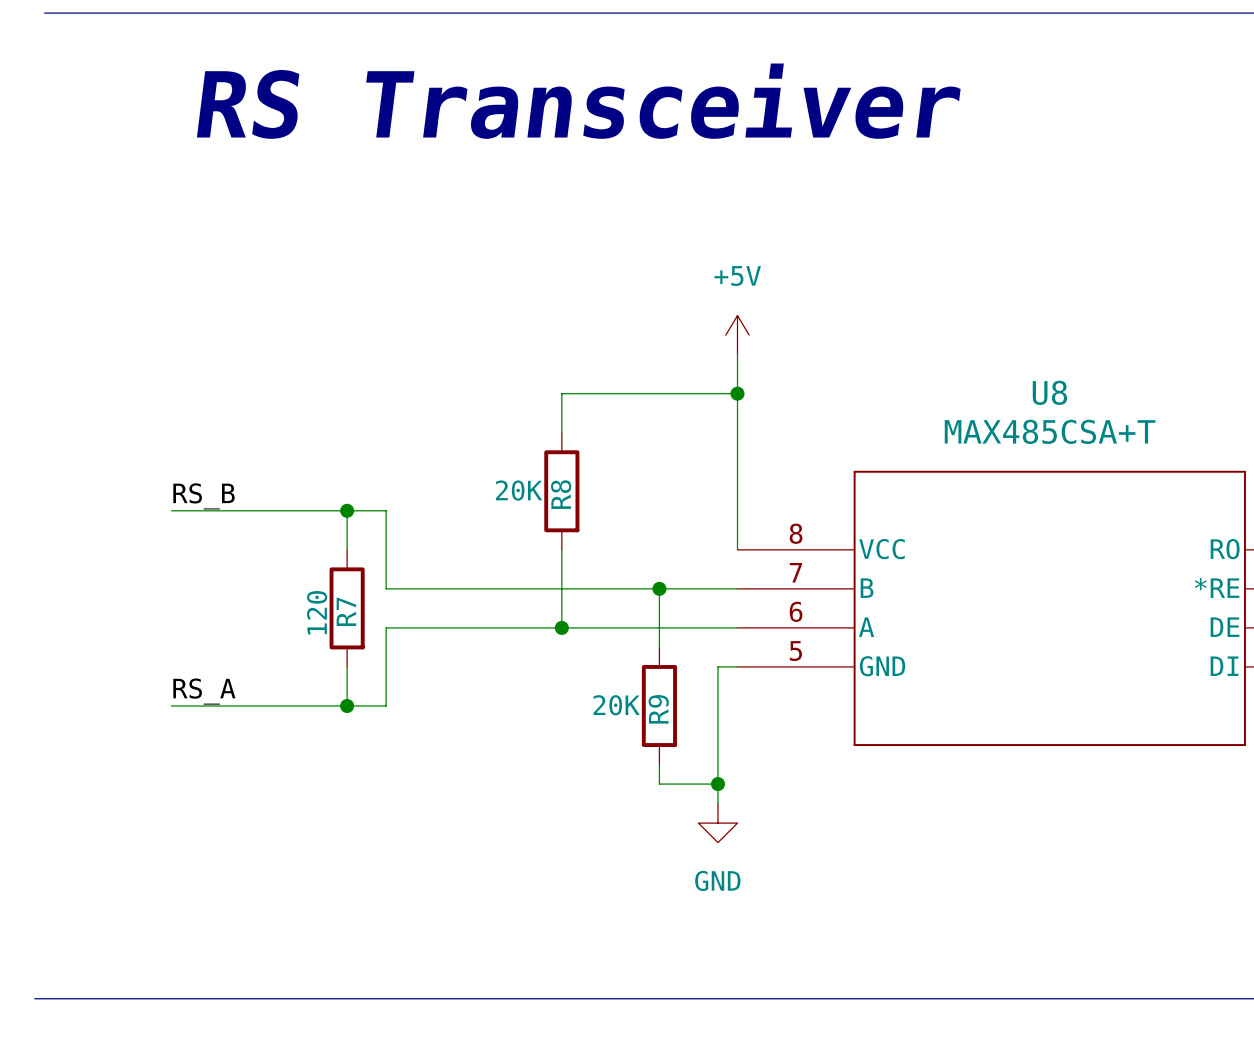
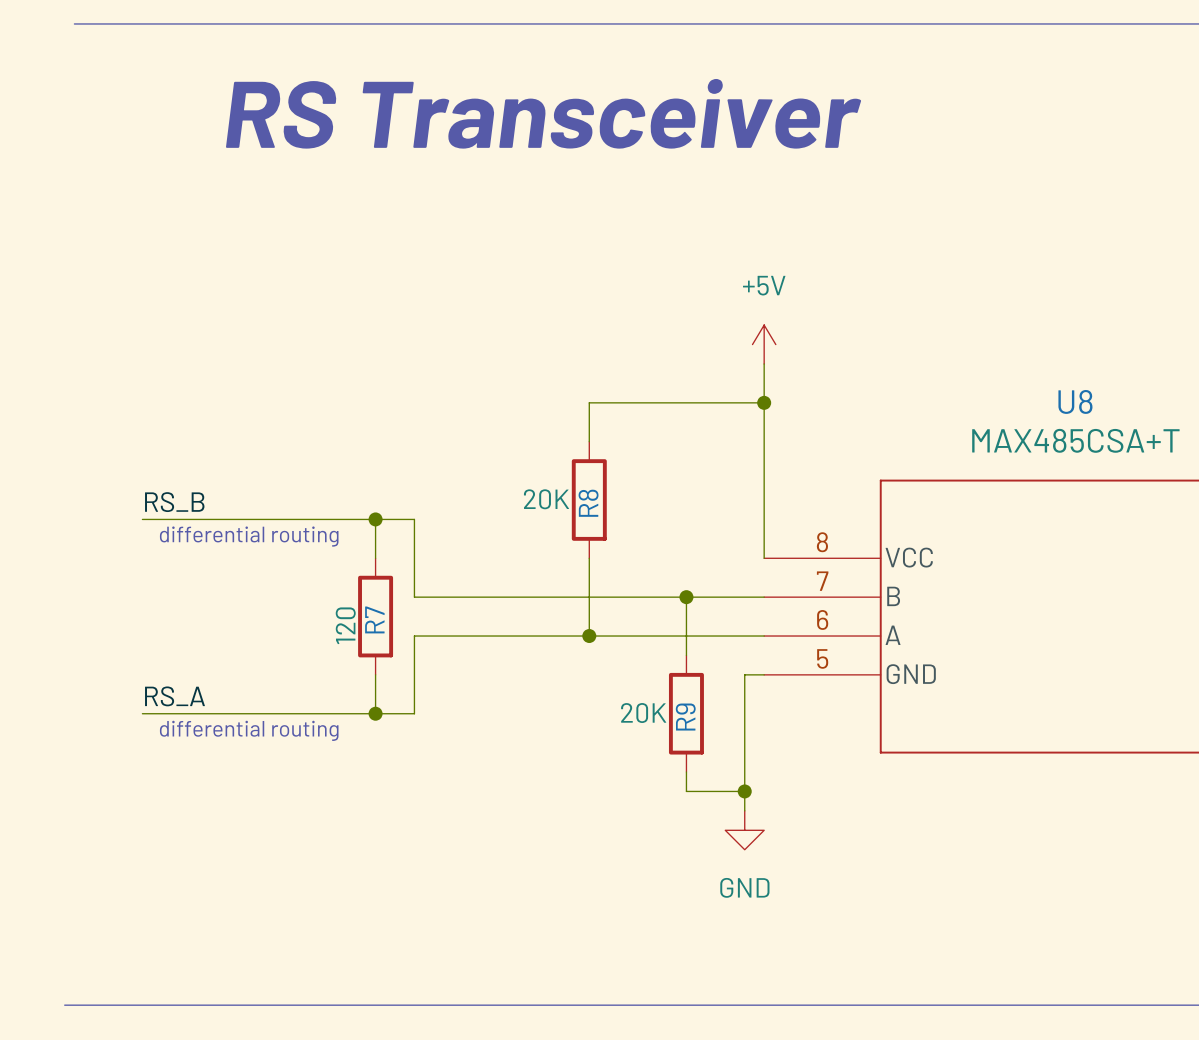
label position: RS_B (204, 496) -> RS_B (174, 502)
wire: none -> (142, 519) (200, 519)
text: none -> differential routing (249, 536)
label position: RS_A (204, 691) -> RS_A (174, 696)
wire: none -> (142, 713) (200, 713)
text: none -> differential routing (249, 730)

